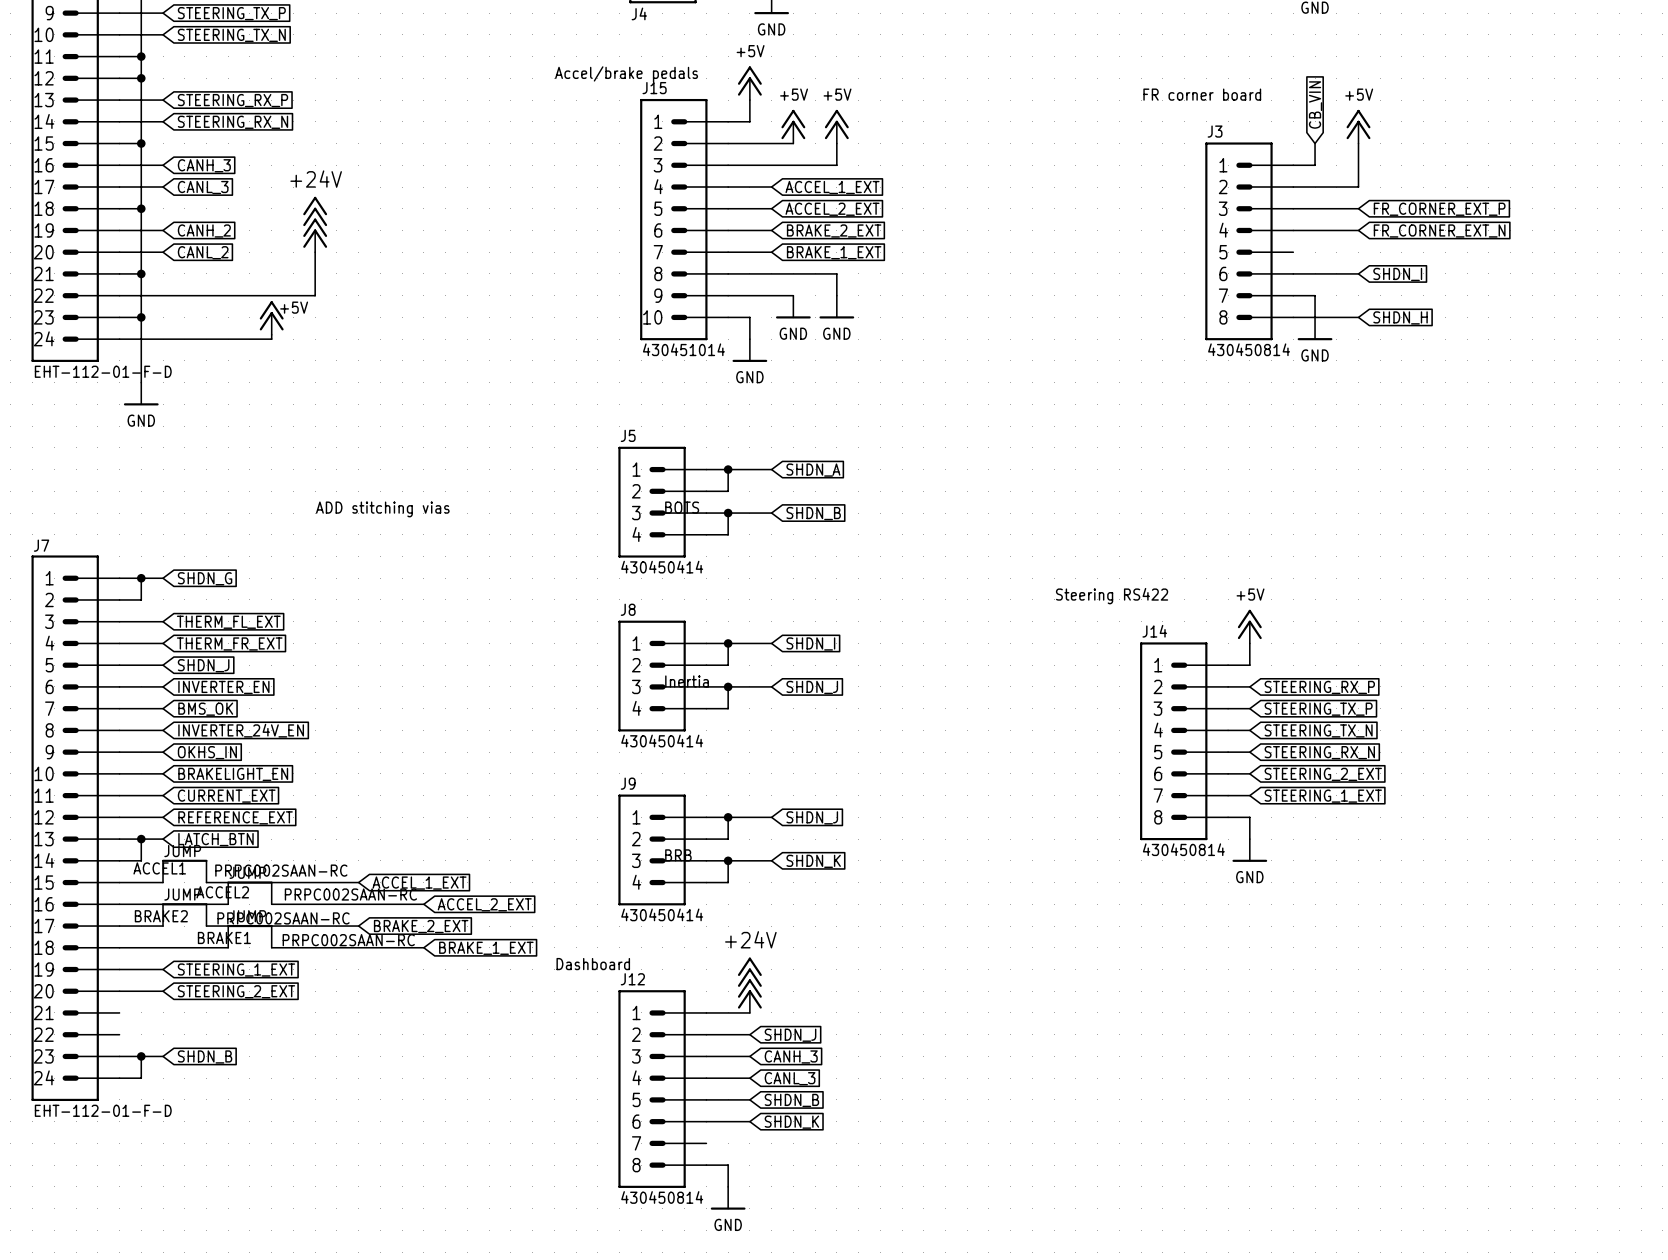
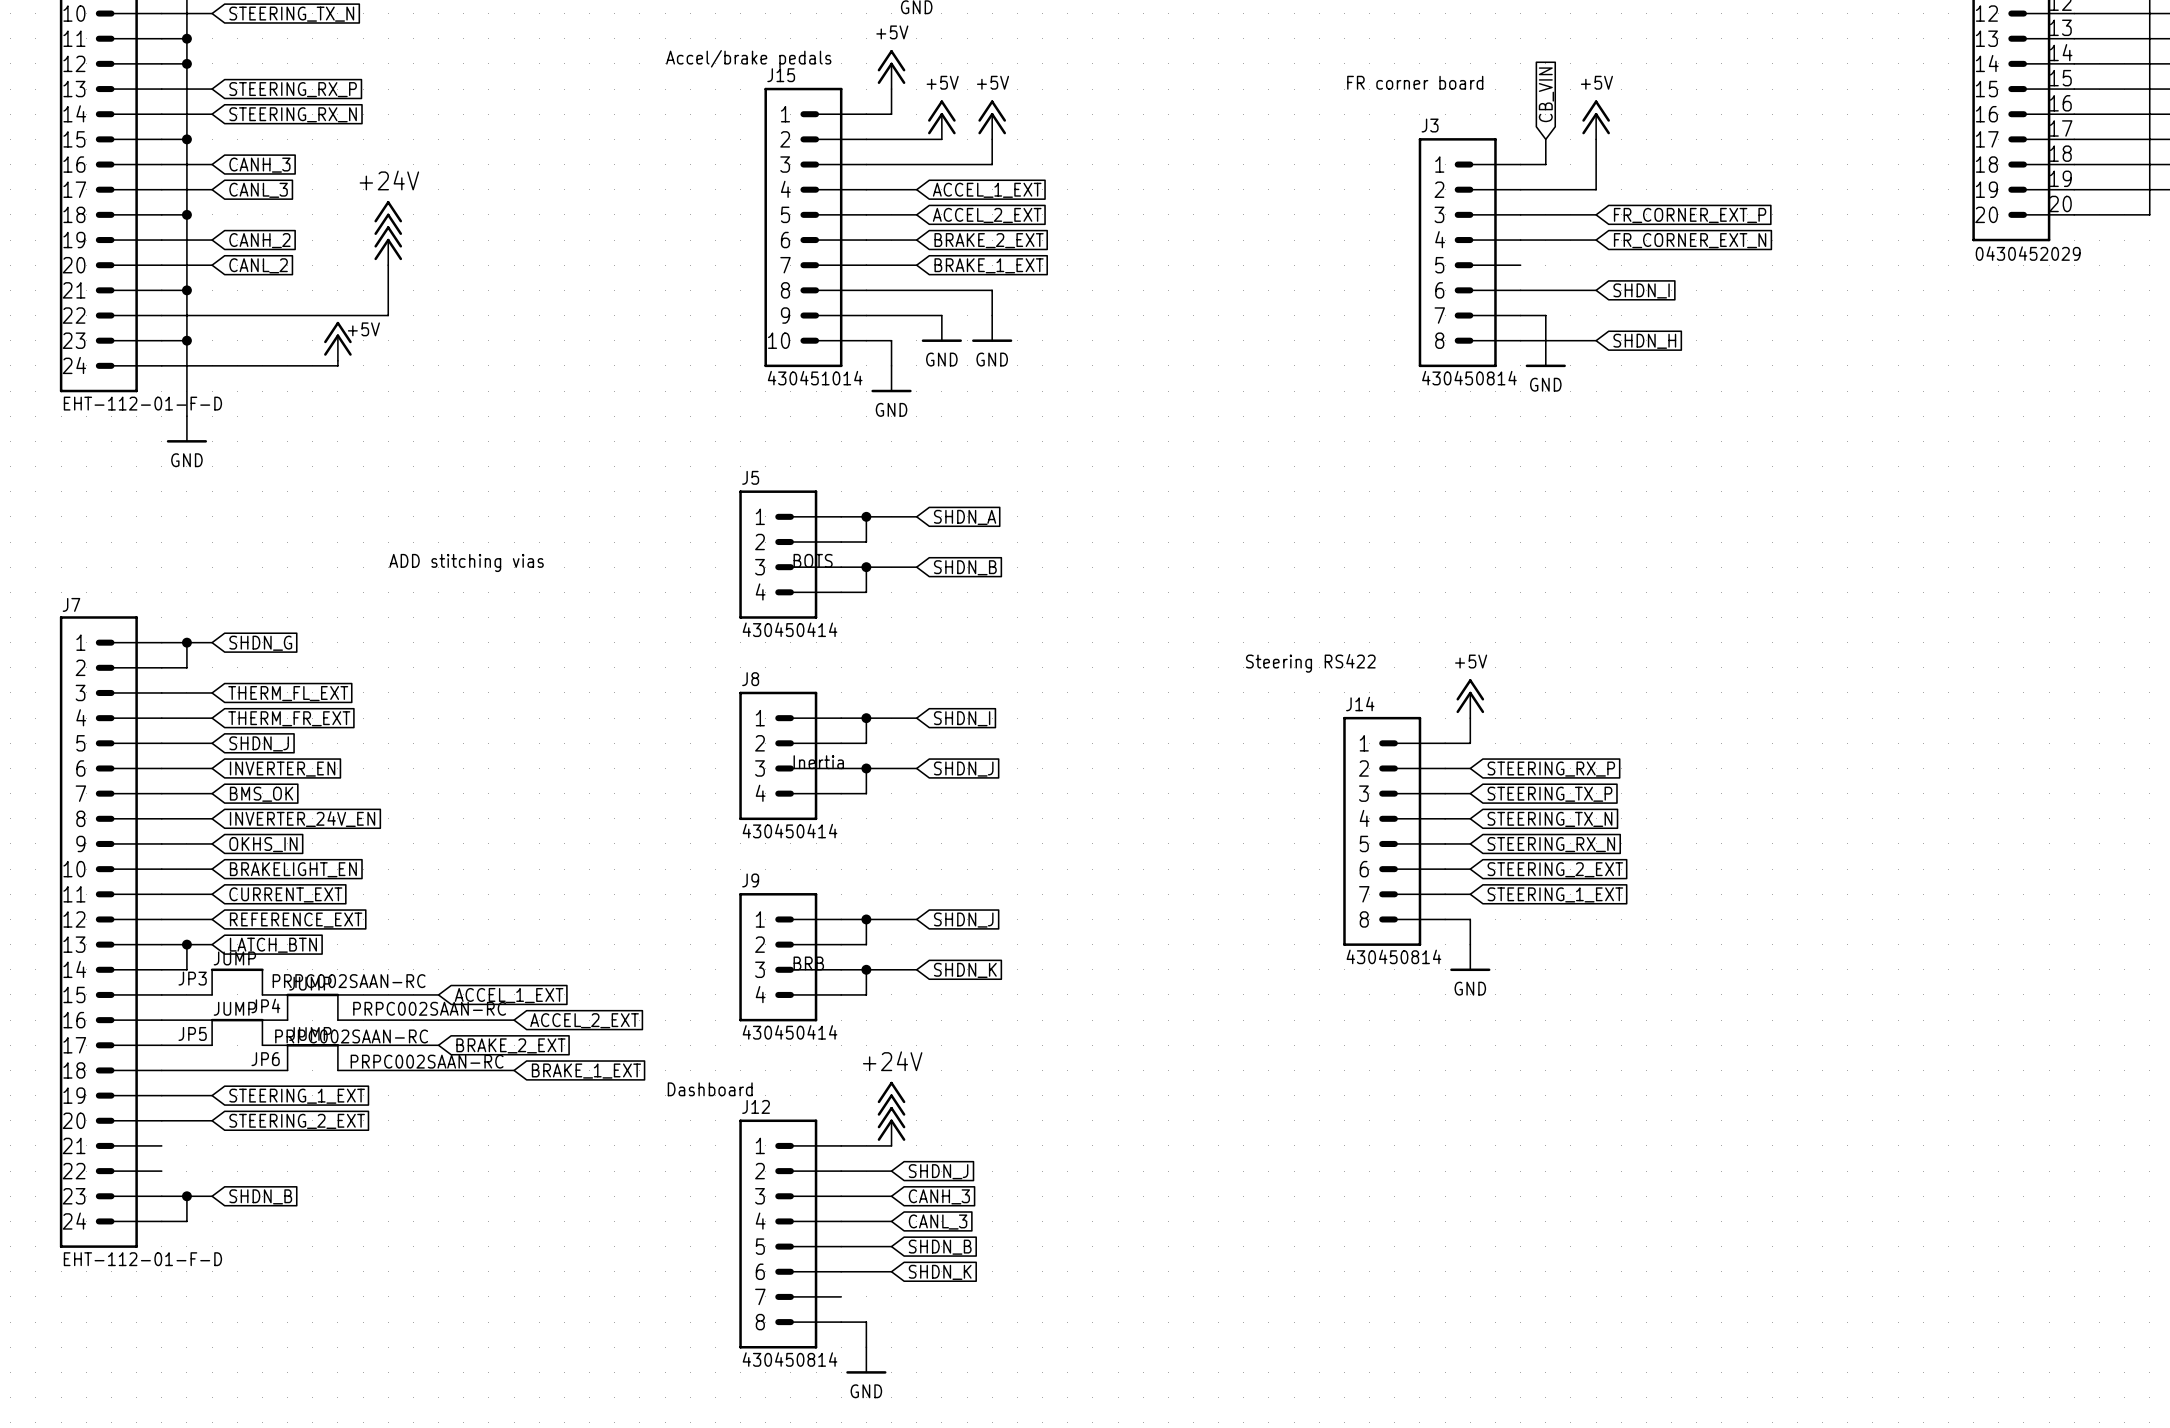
ACCEL1 name: ACCEL1 (159, 868) -> JP3 (192, 978)
ACCEL2 name: ACCEL2 (222, 892) -> JP4 (265, 1005)
BRAKE2 name: BRAKE2 (161, 916) -> JP5 (192, 1033)
BRAKE1 name: BRAKE1 (224, 937) -> JP6 (265, 1059)

